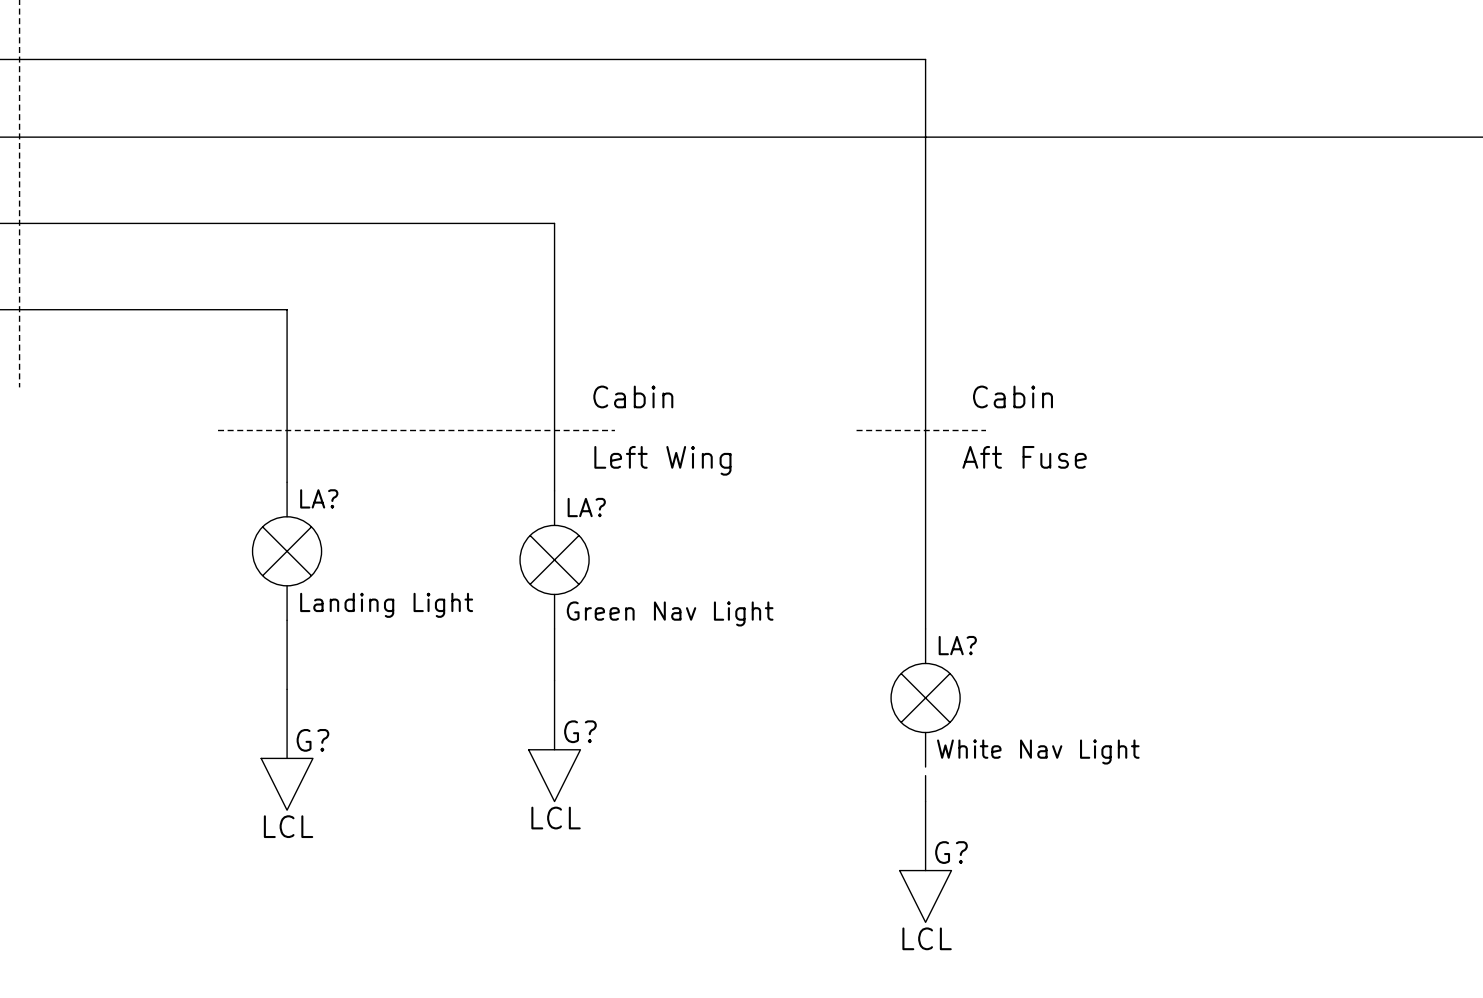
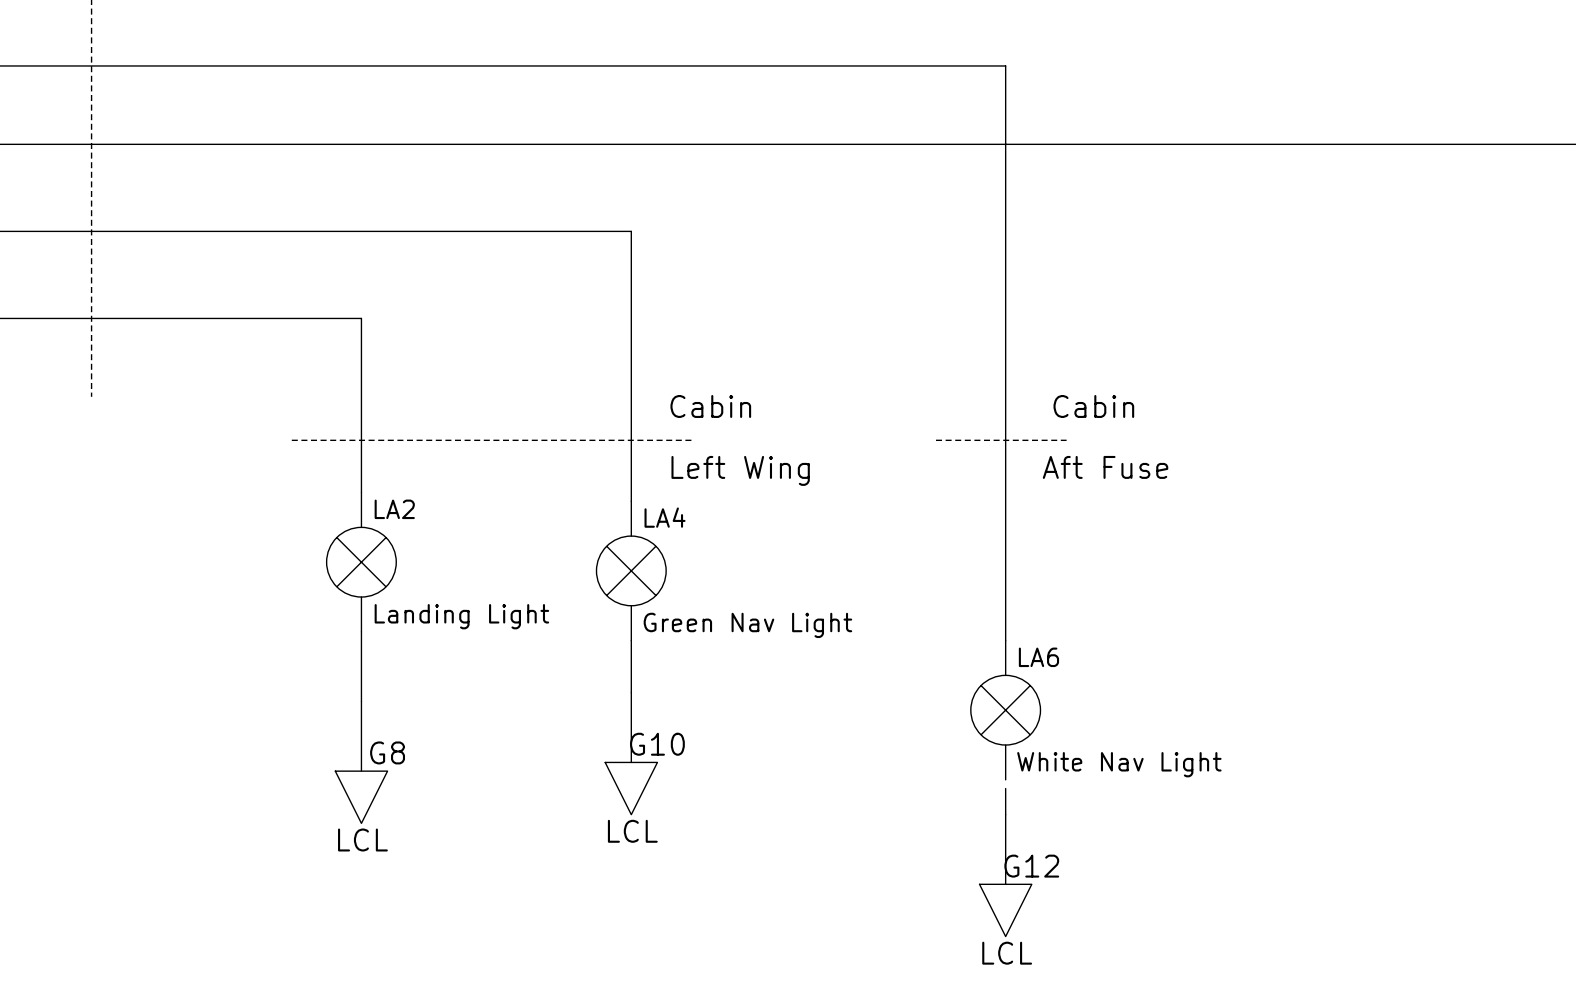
LA? name: LA? (319, 498) -> LA2 (394, 509)
LA? name: LA? (586, 507) -> LA4 (665, 517)
LA? name: LA? (957, 645) -> LA6 (1038, 657)
G? name: G? (580, 731) -> G10 (657, 744)
G? name: G? (312, 740) -> G8 (387, 752)
G? name: G? (951, 852) -> G12 (1031, 866)

